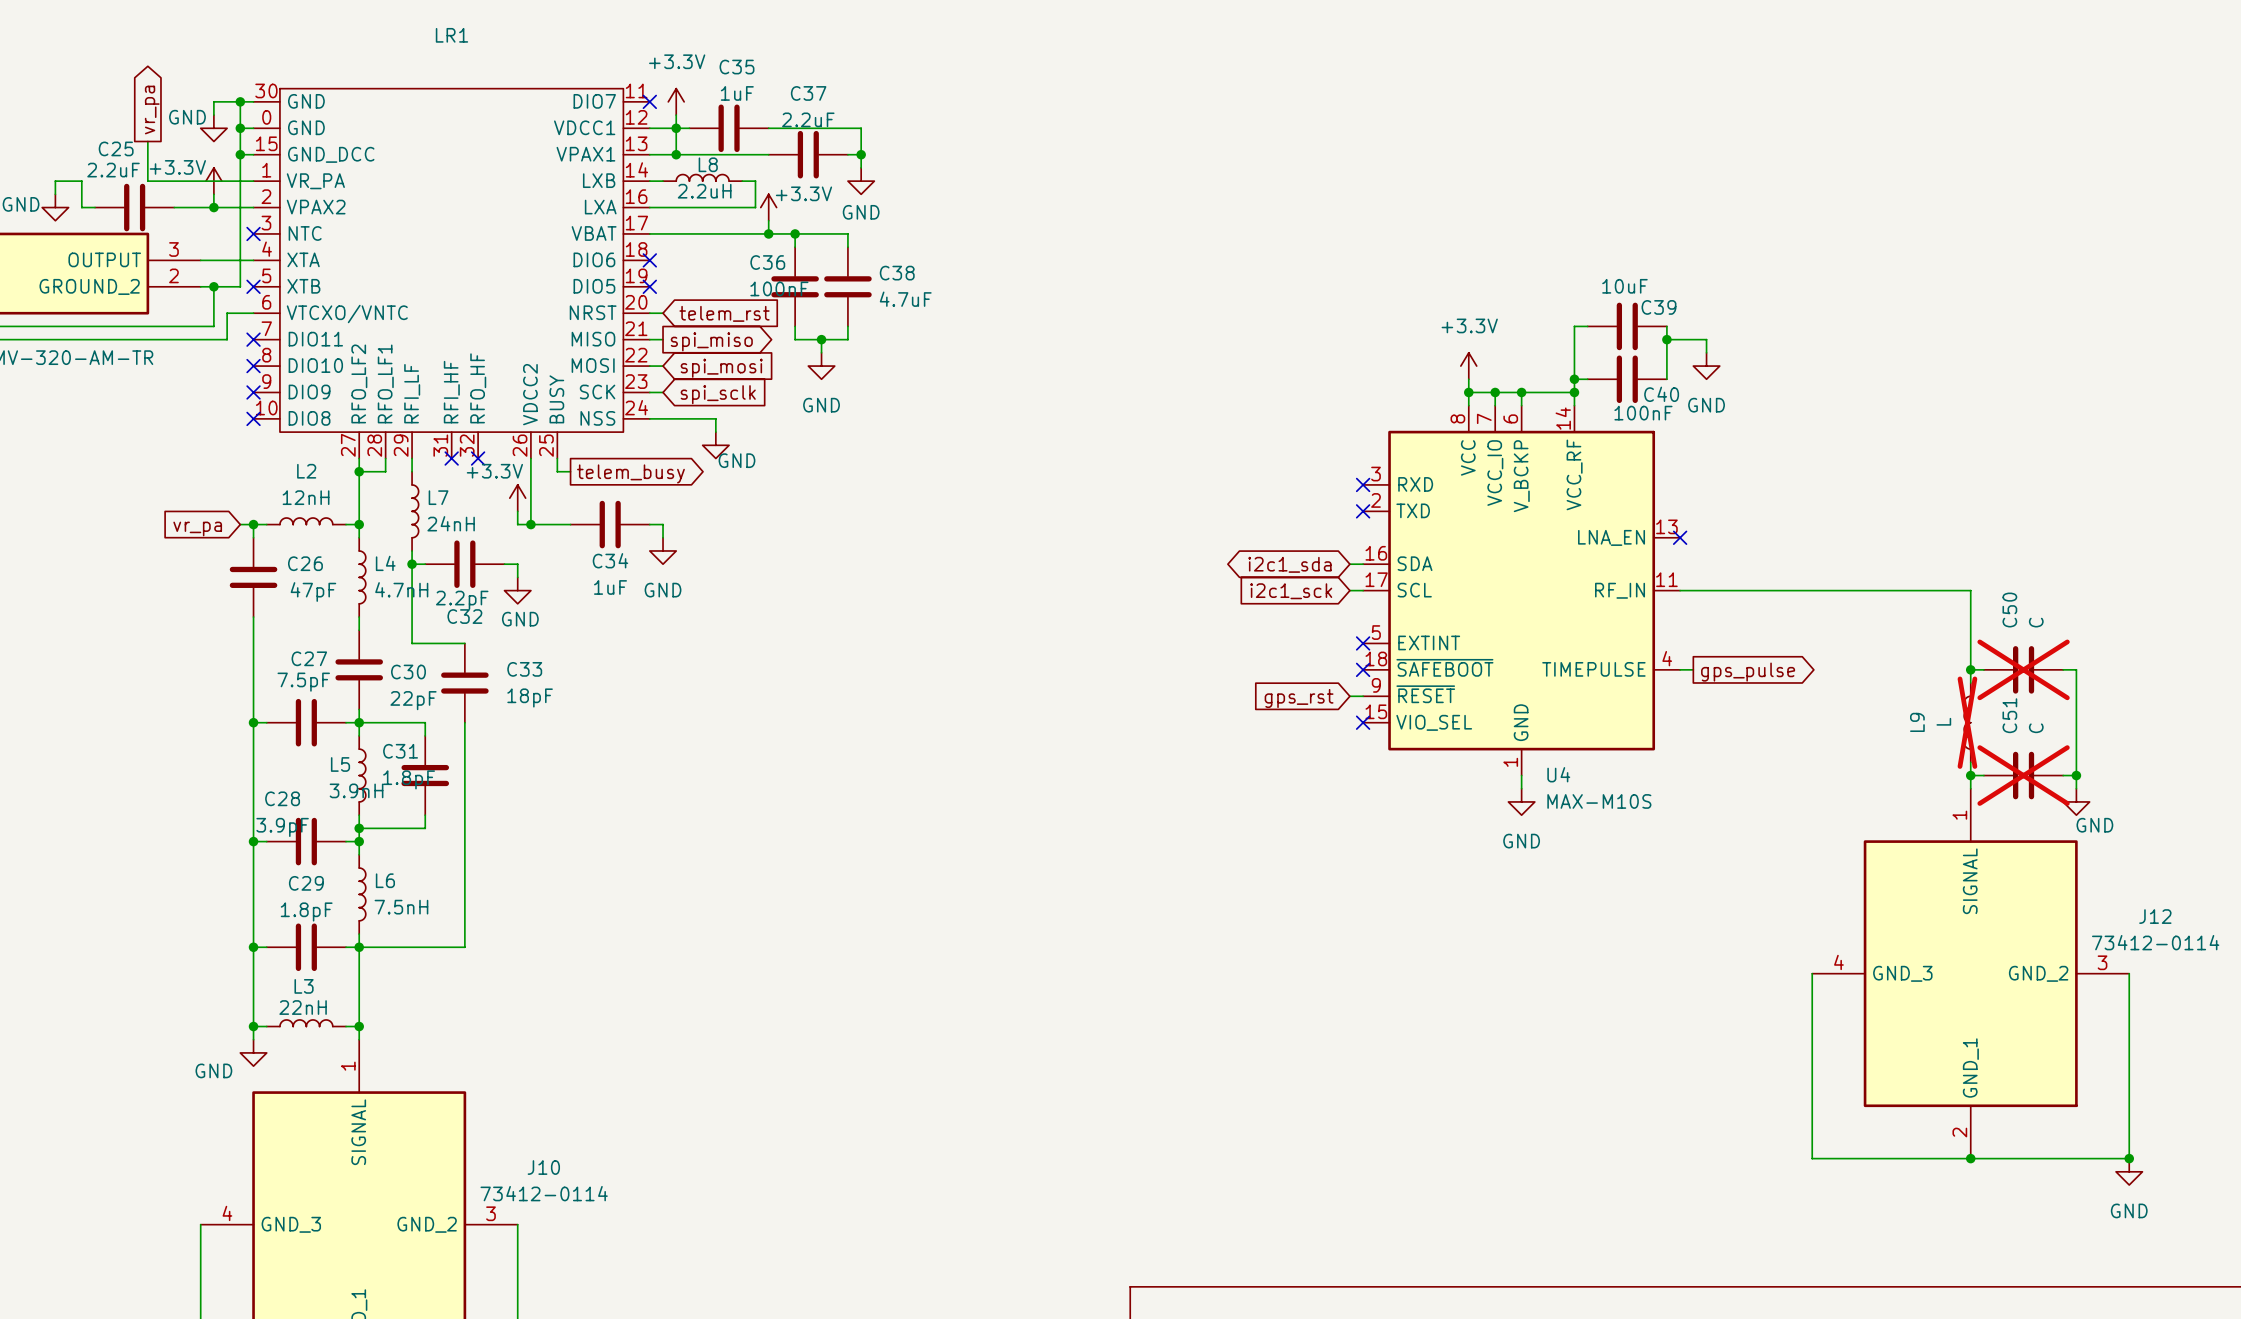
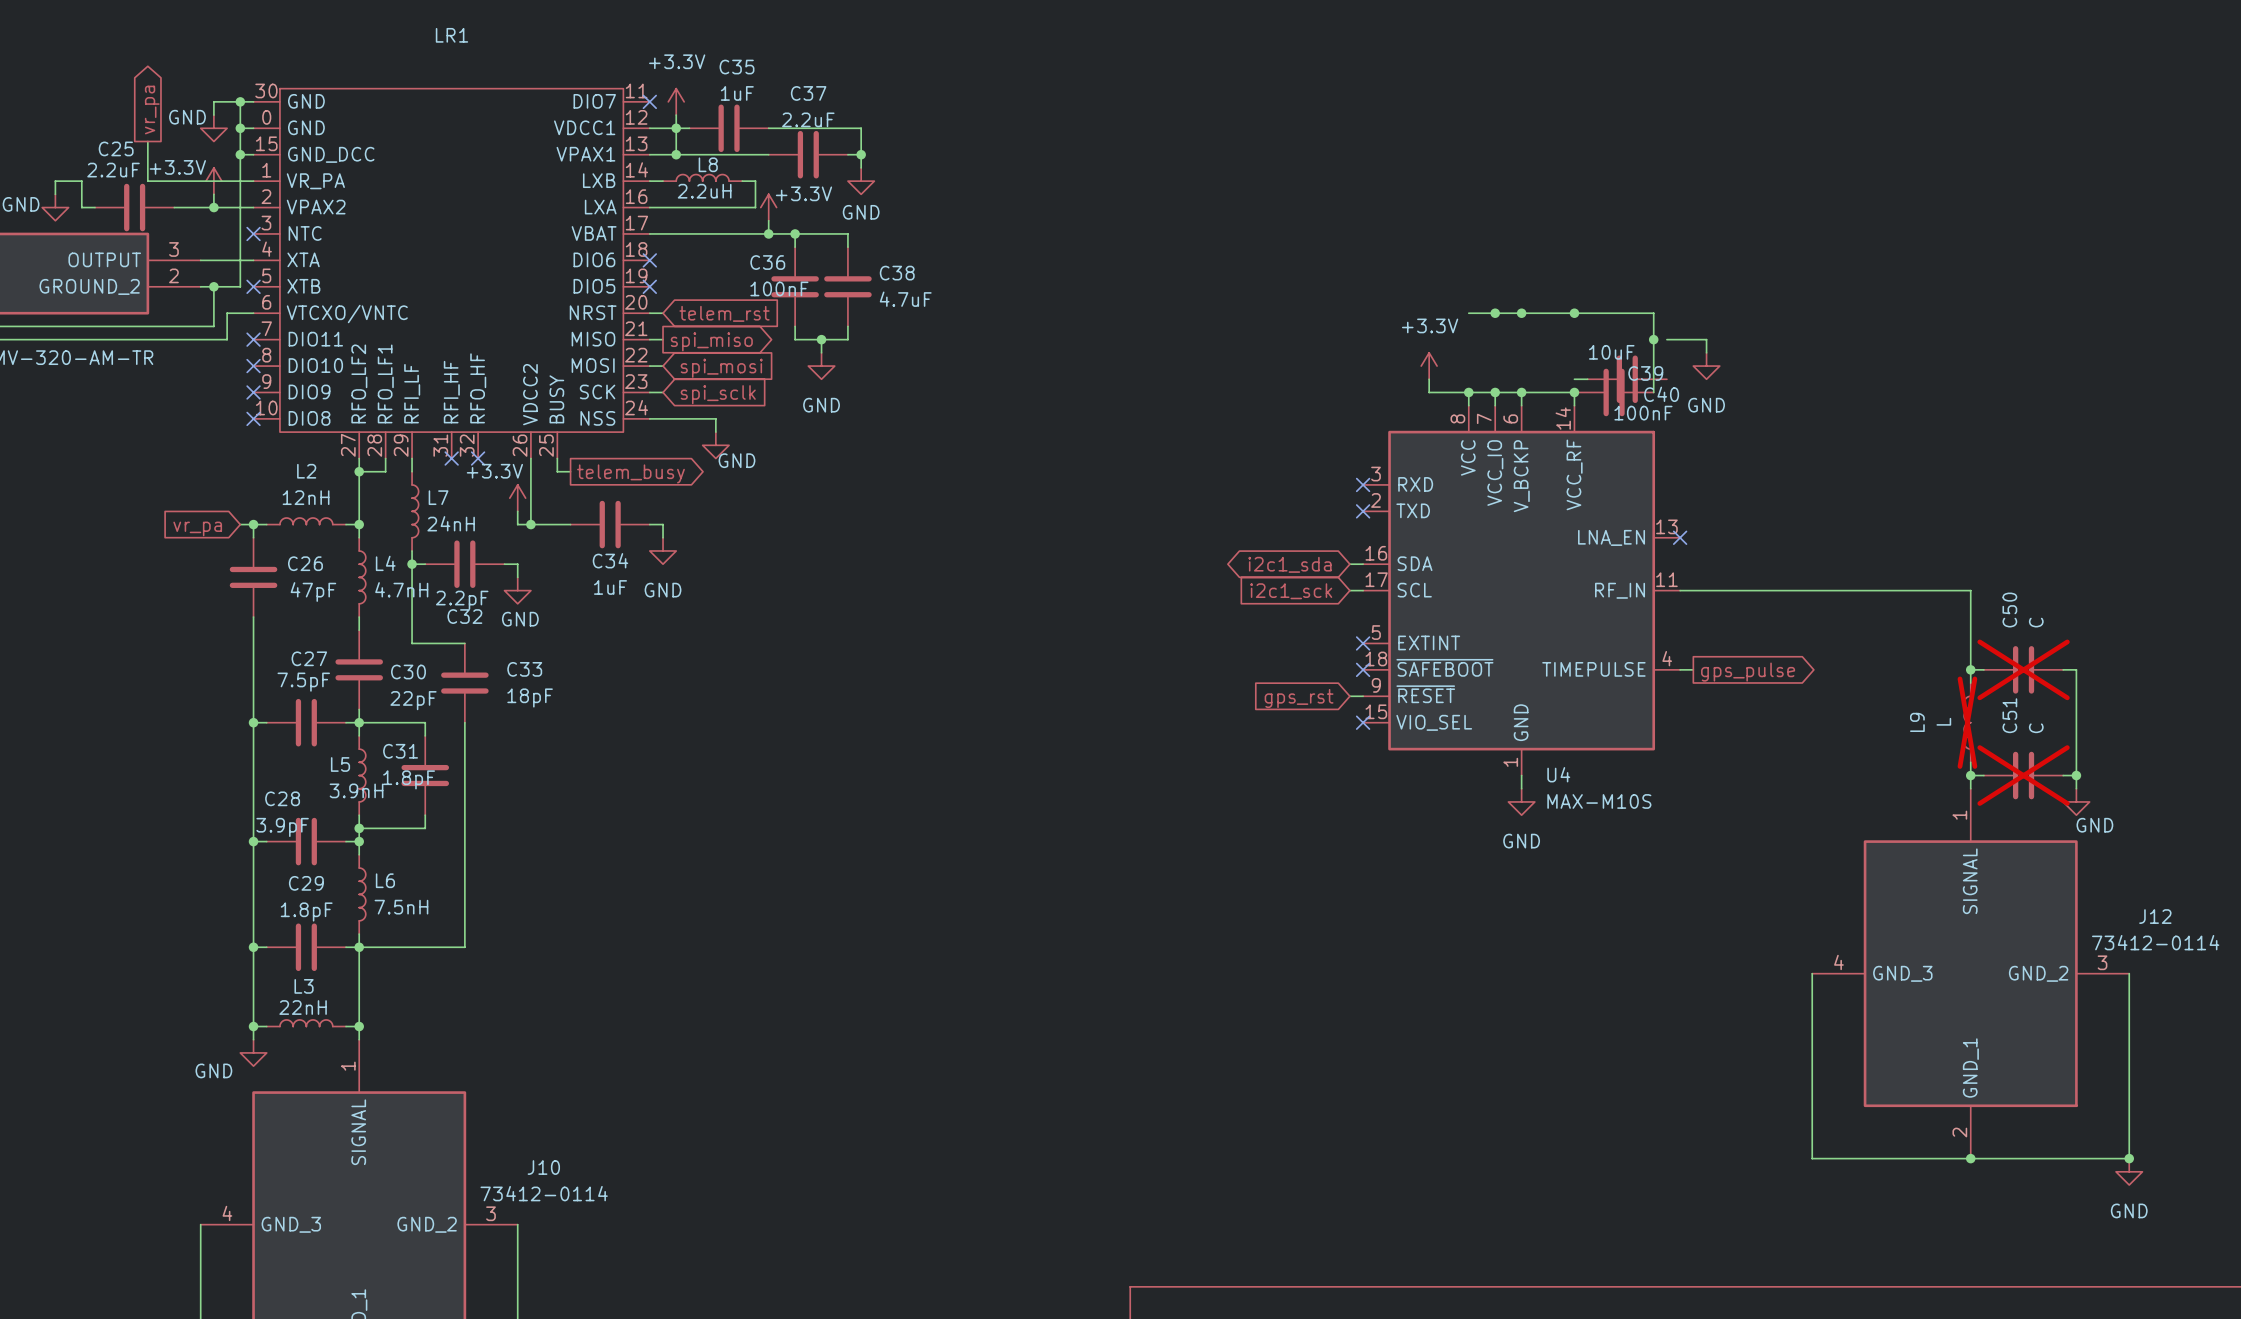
wire: none -> (1468, 313) (1653, 313) (1653, 392)
junction: none -> (1495, 313)
junction: none -> (1521, 313)
junction: none -> (1574, 313)
wire: (1587, 326) (1574, 326) (1574, 392) -> none
C39 position: (1627, 326) -> (1614, 392)
wire: (1666, 326) (1666, 379) -> none
junction position: (1666, 339) -> (1653, 339)
power symbol position: +3.3V (1468, 366) -> +3.3V (1429, 366)
wire: (1468, 379) (1468, 392) -> (1429, 379) (1429, 392) (1468, 392)
junction: (1574, 379) -> none

